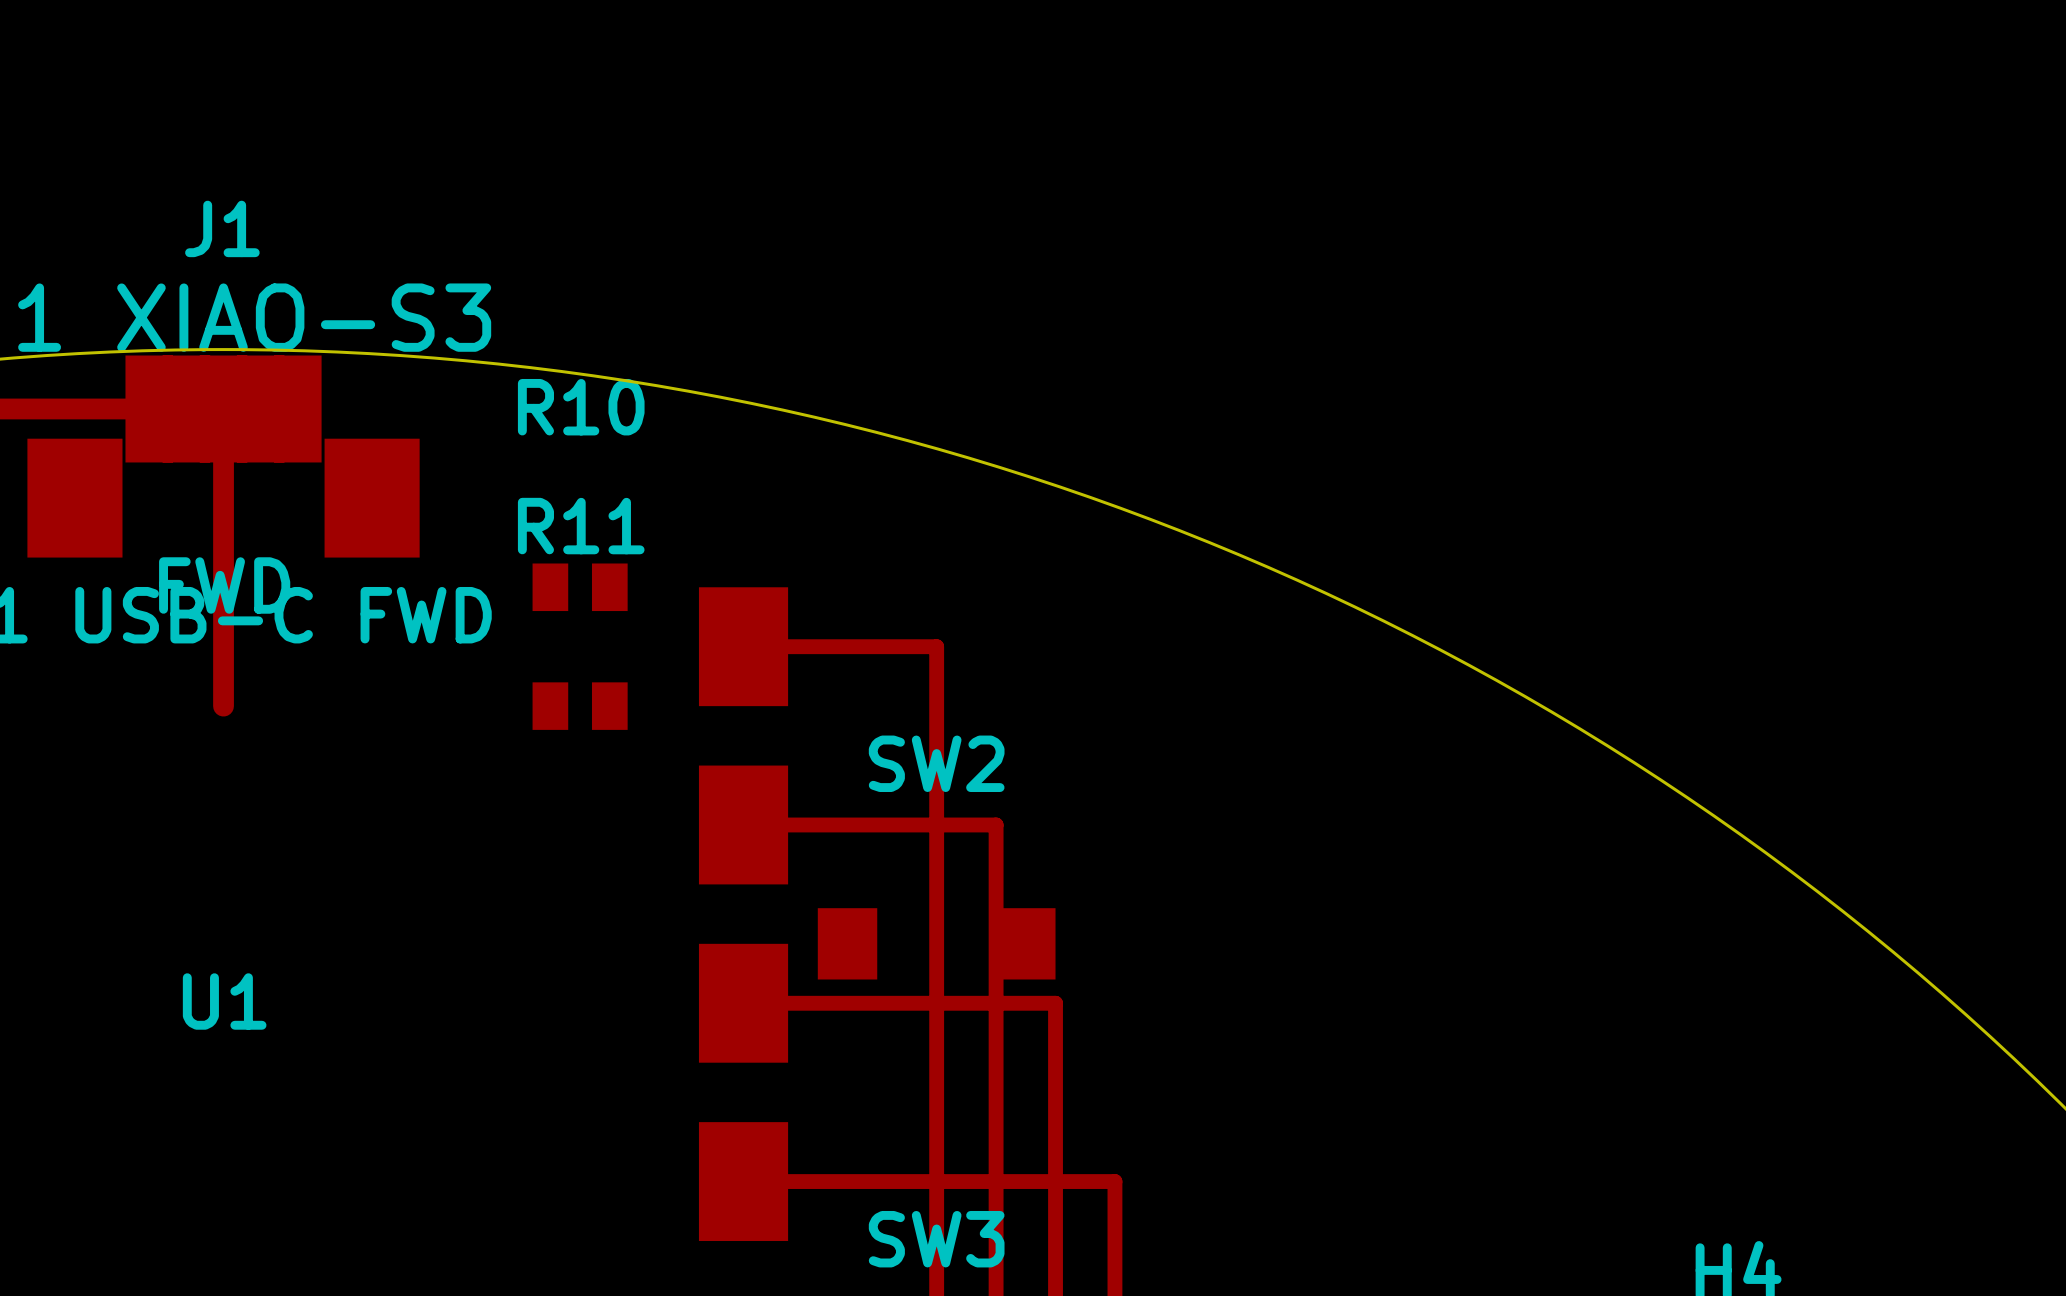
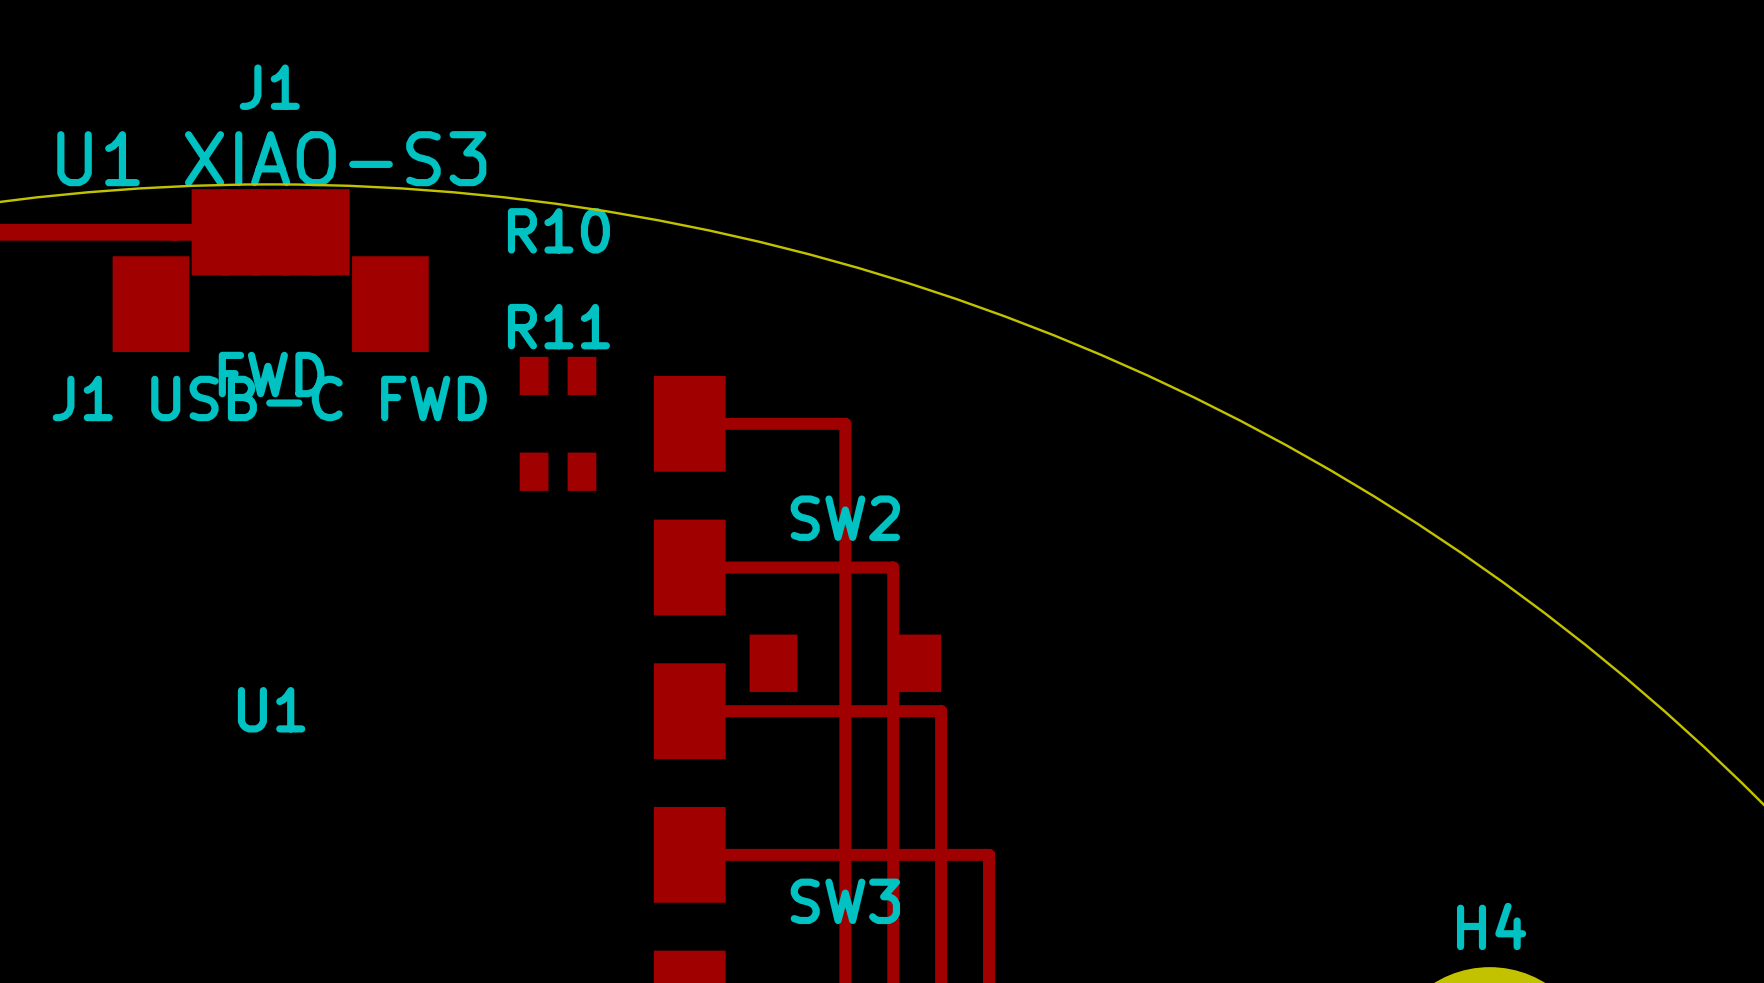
track: (149, 408) (223, 408) (223, 706) -> none

